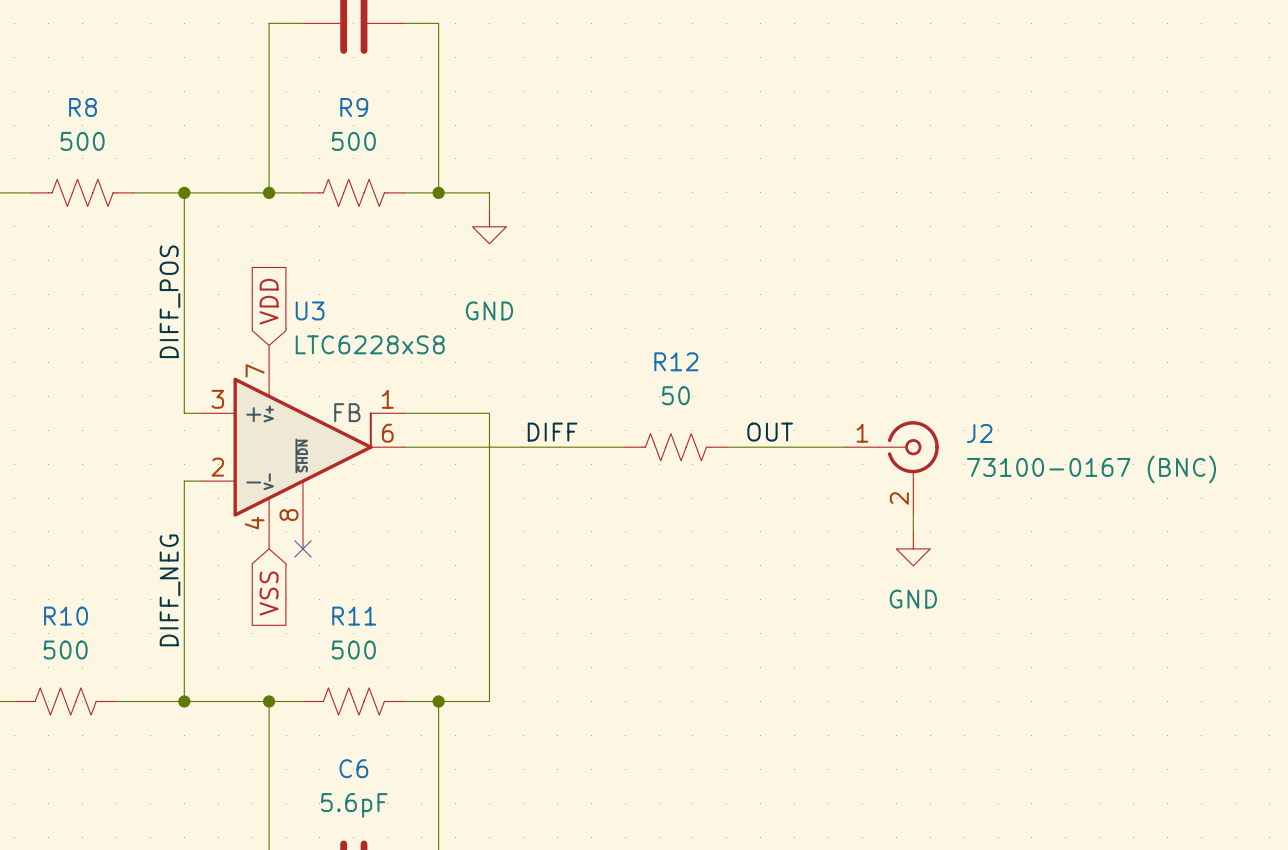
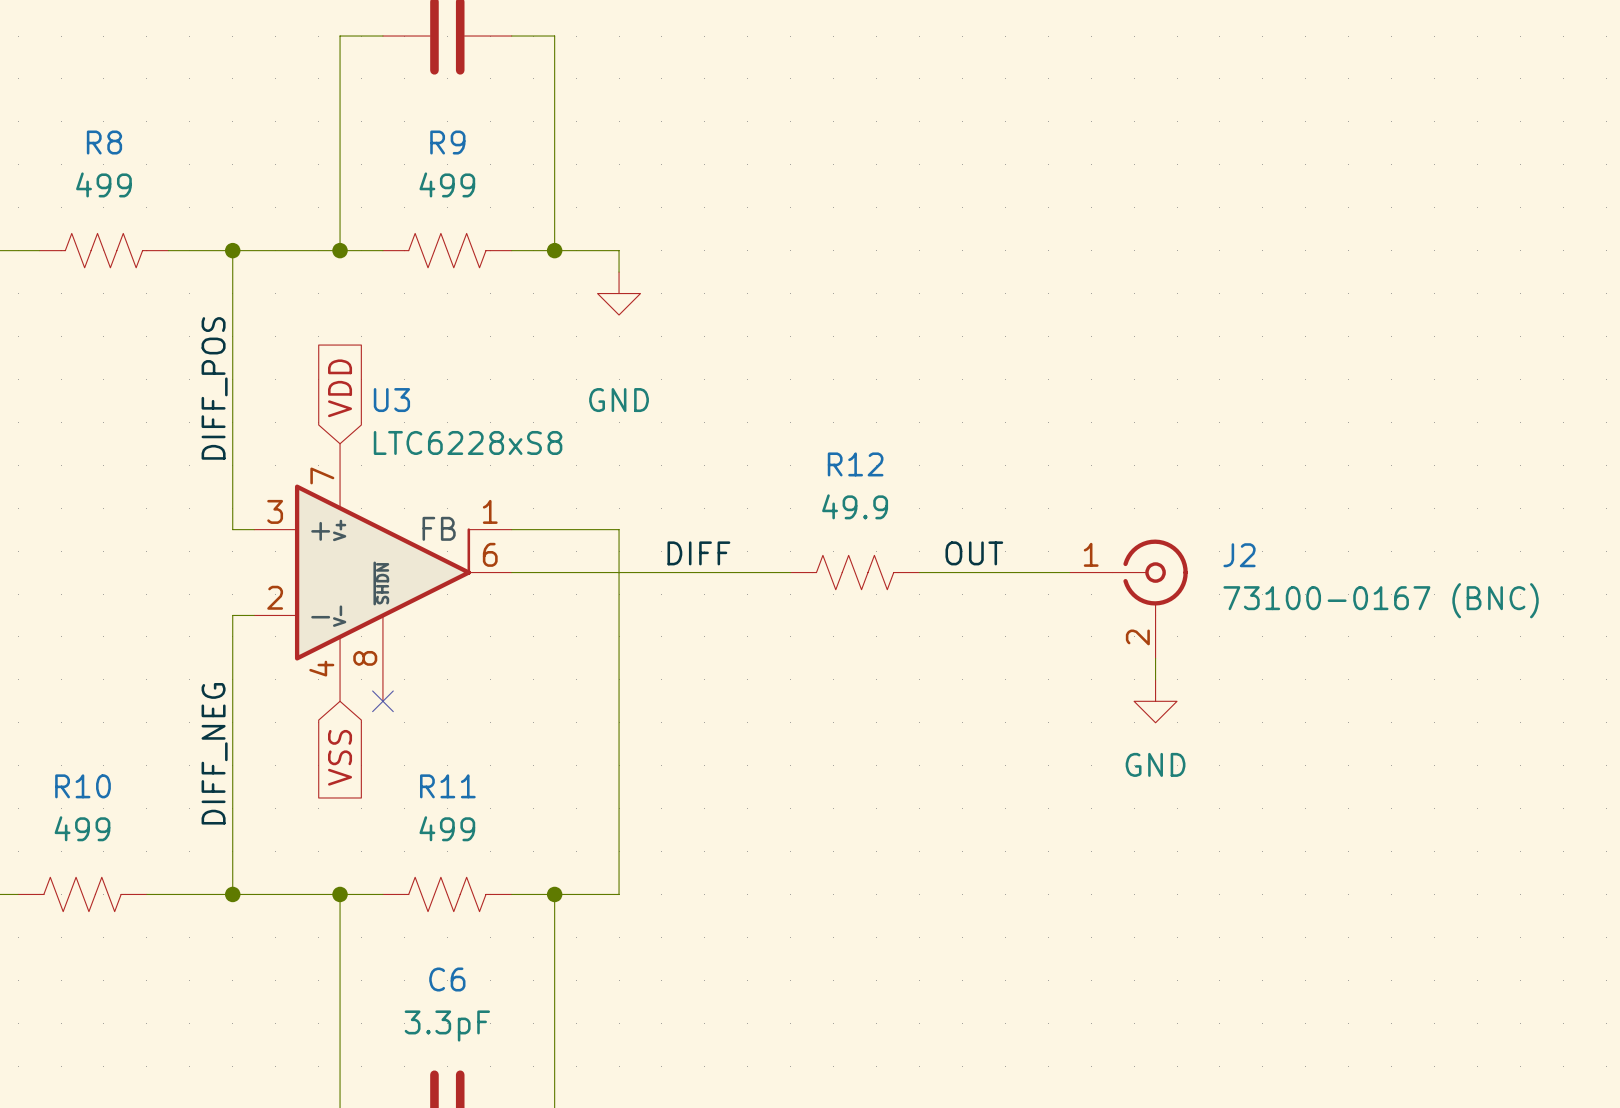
R8 value: 500 (82, 141) -> 499 (103, 184)
R9 value: 500 (353, 141) -> 499 (447, 184)
R12 value: 50 (675, 395) -> 49.9 (855, 506)
R10 value: 500 (65, 650) -> 499 (82, 828)
R11 value: 500 (353, 650) -> 499 (447, 828)
C6 value: 5.6pF (354, 805) -> 3.3pF (447, 1026)

